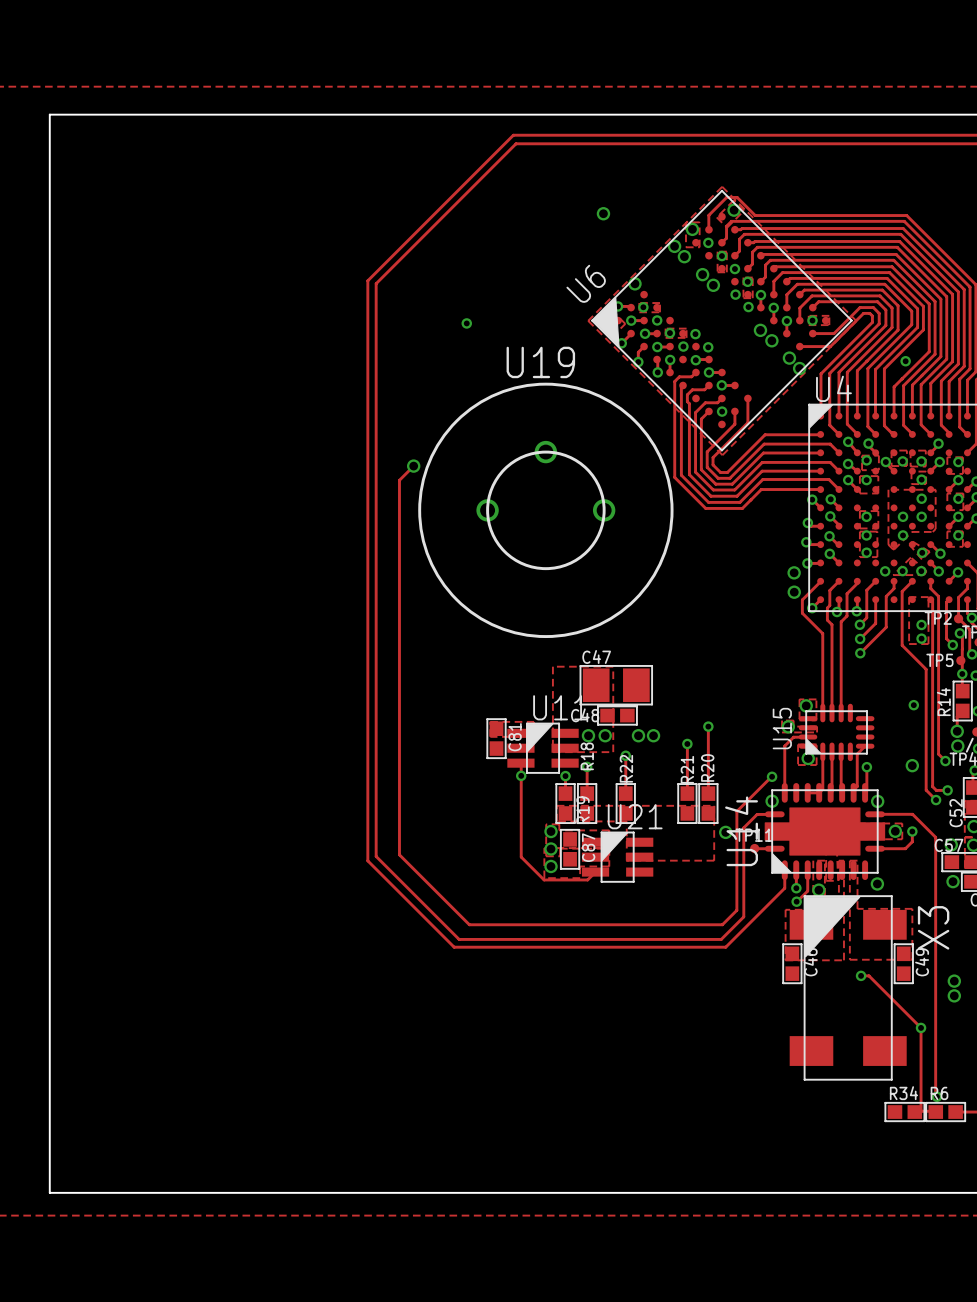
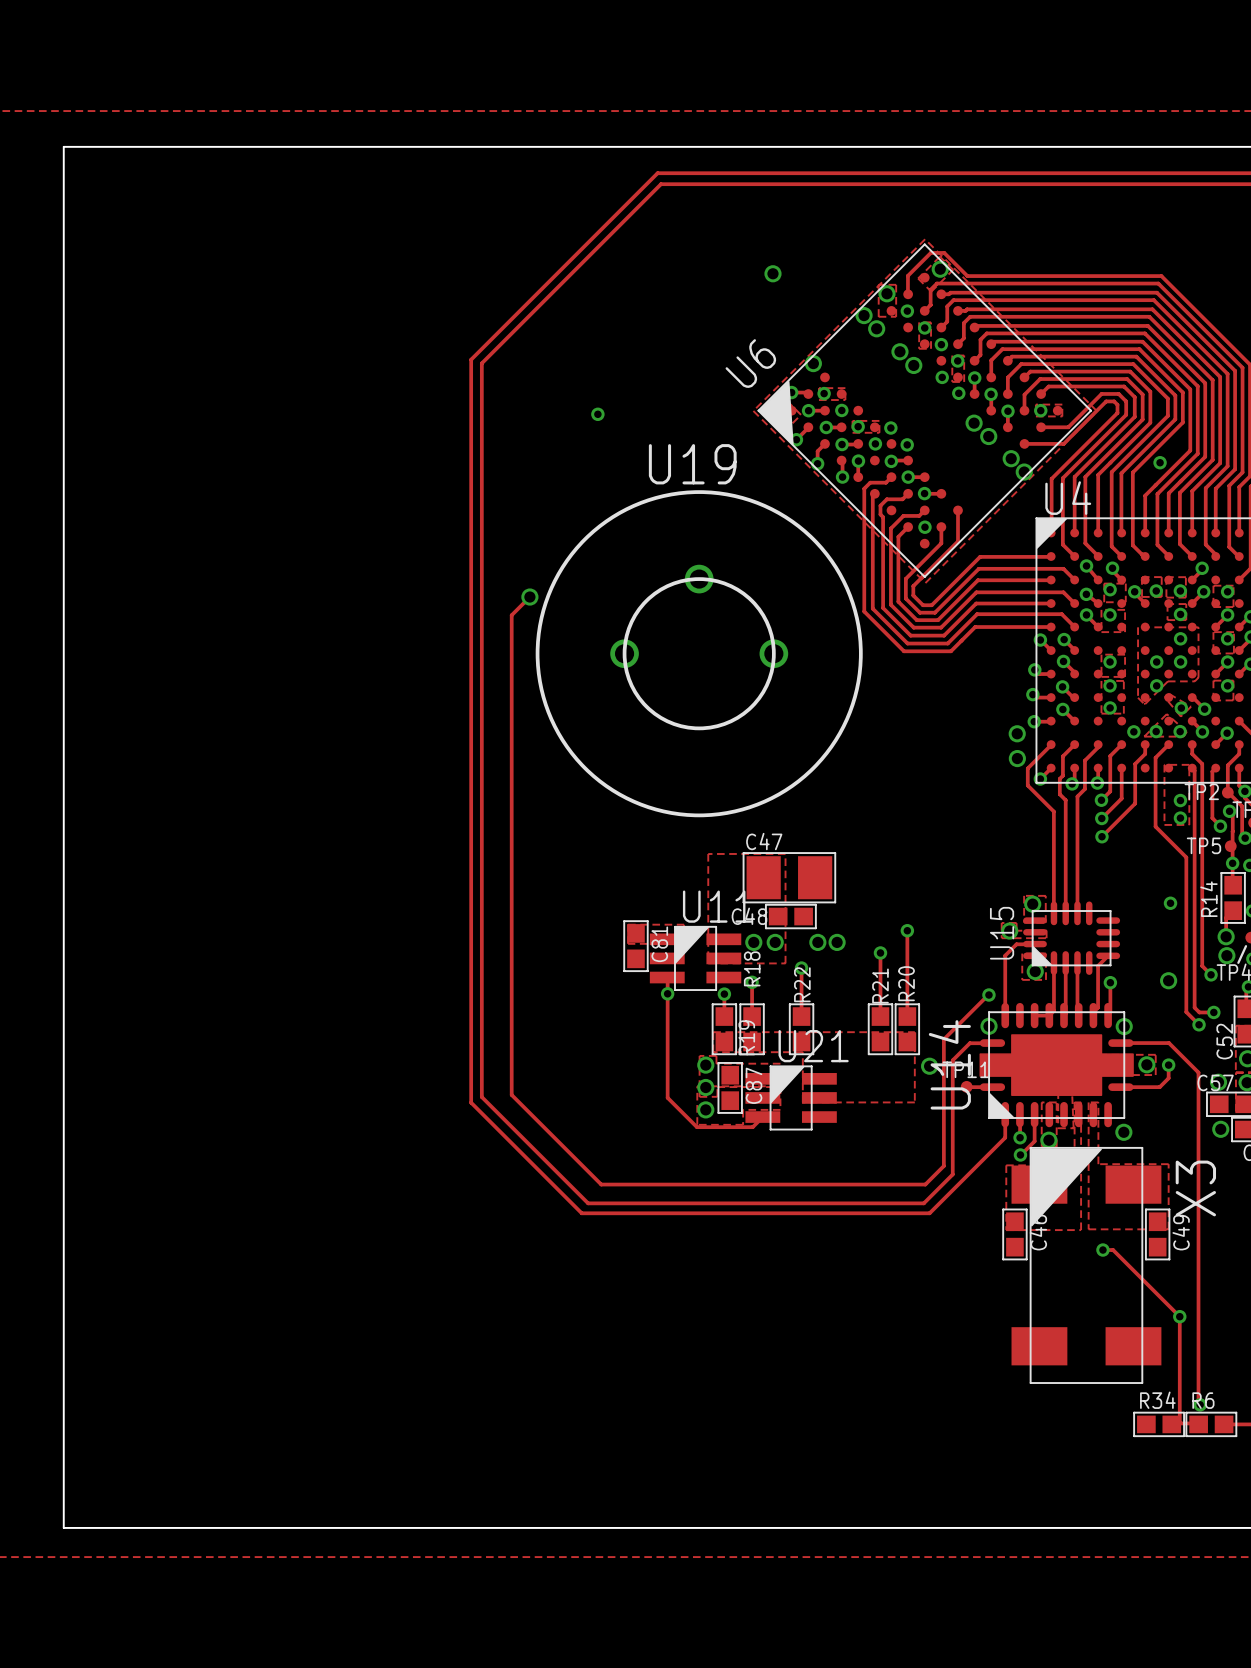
via: (954, 981) -> none
via: (954, 995) -> none

